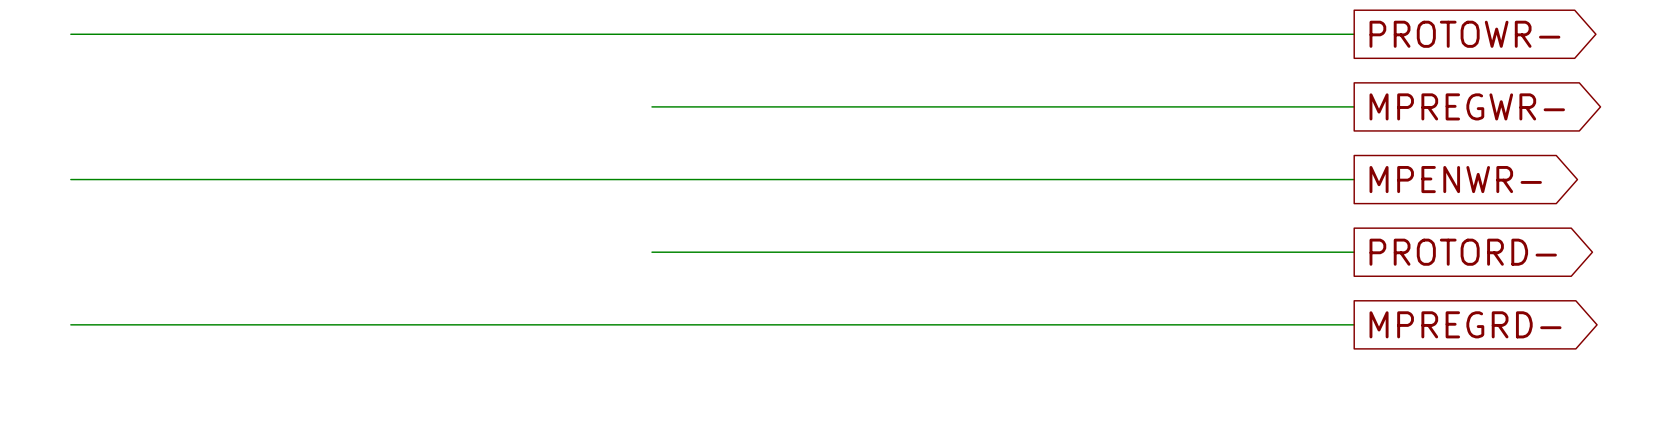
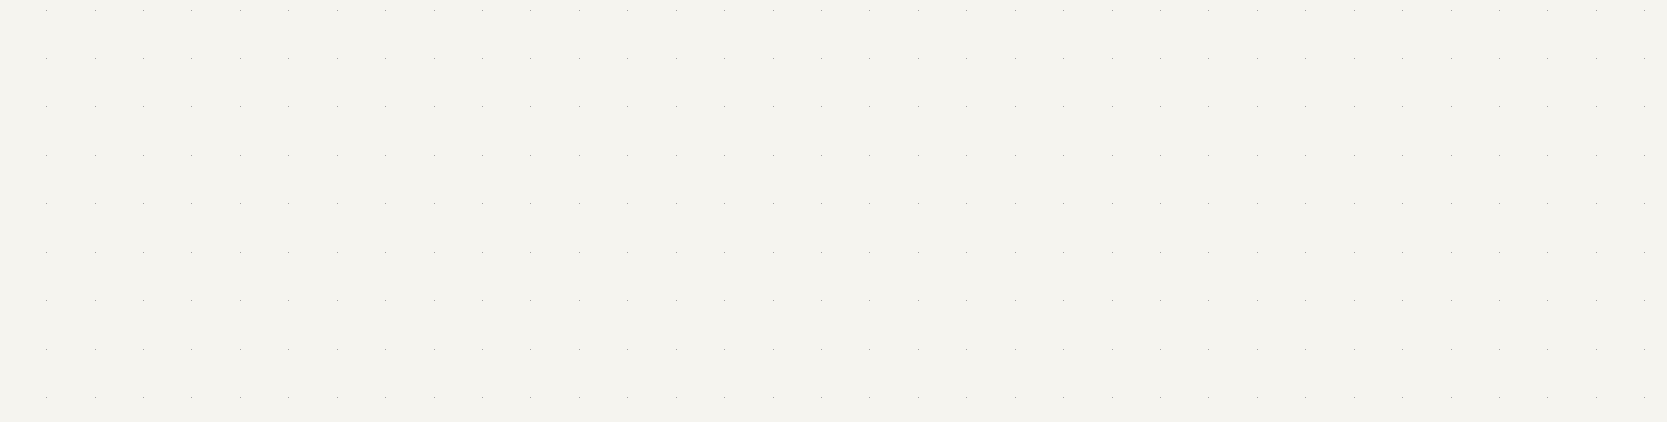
wire: (70, 34) (1354, 34) -> none
global label: PROTOWR- (1464, 34) -> none
wire: (651, 106) (1354, 106) -> none
global label: MPREGWR- (1467, 106) -> none
wire: (70, 179) (1354, 179) -> none
global label: MPENWR- (1455, 179) -> none
wire: (651, 252) (1354, 252) -> none
global label: PROTORD- (1463, 252) -> none
wire: (70, 324) (1354, 324) -> none
global label: MPREGRD- (1465, 324) -> none

